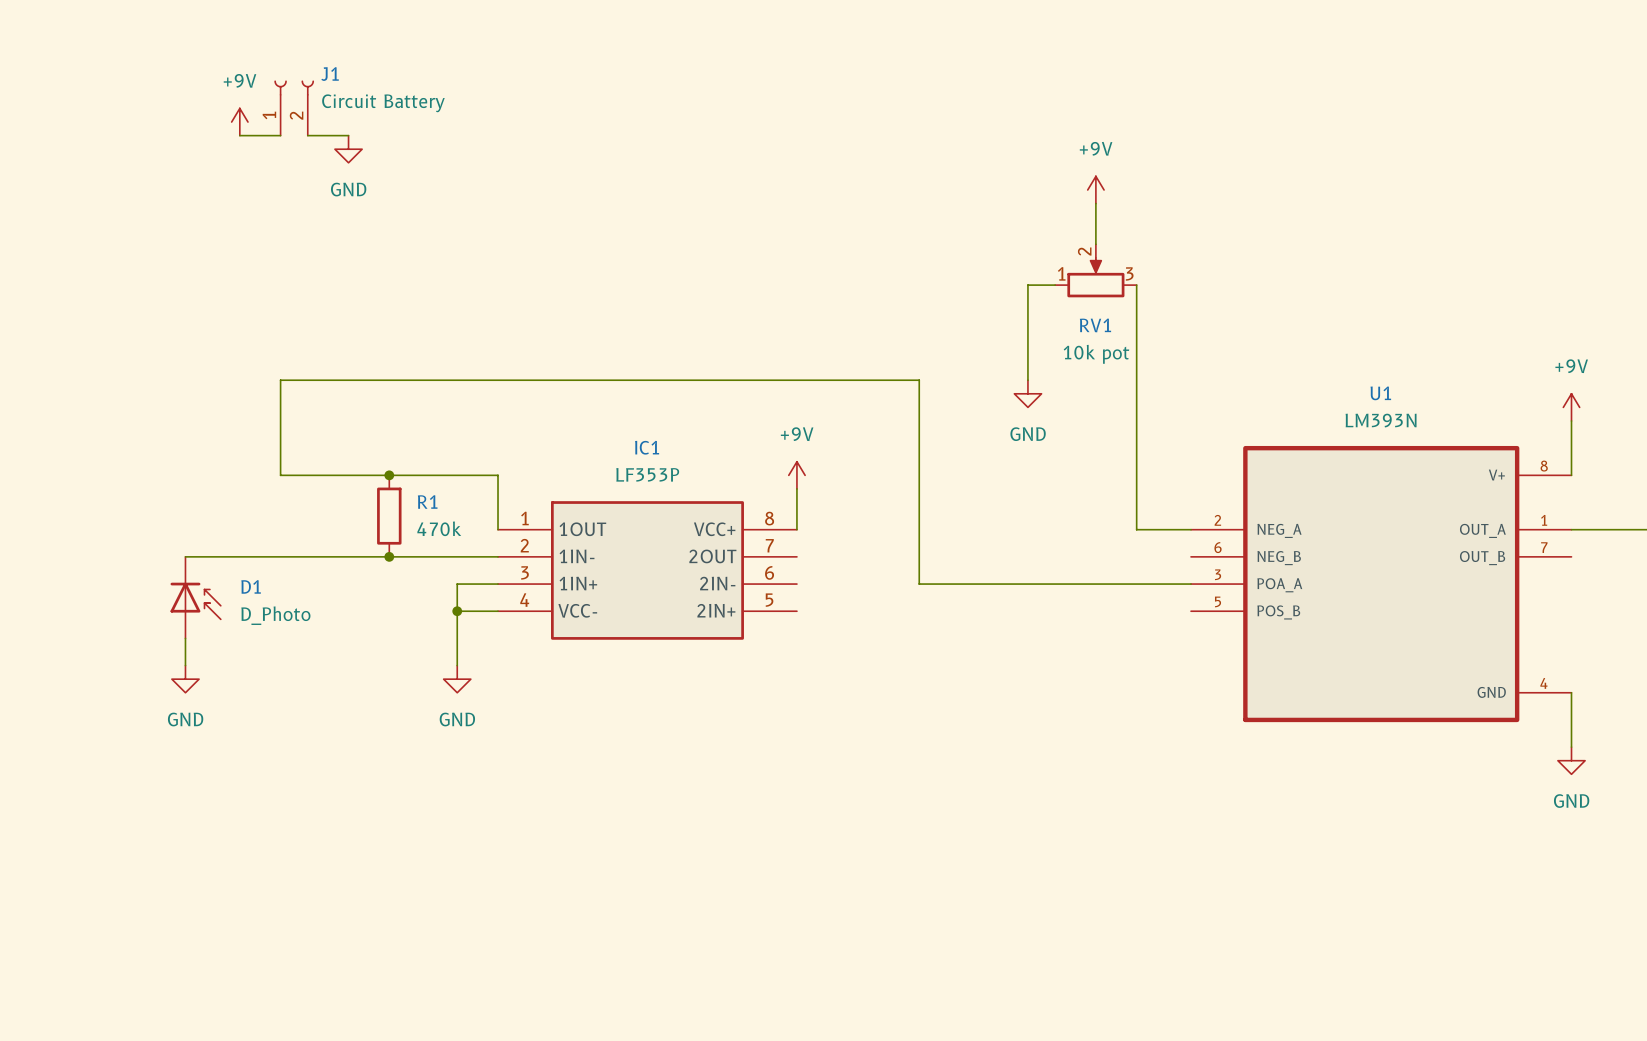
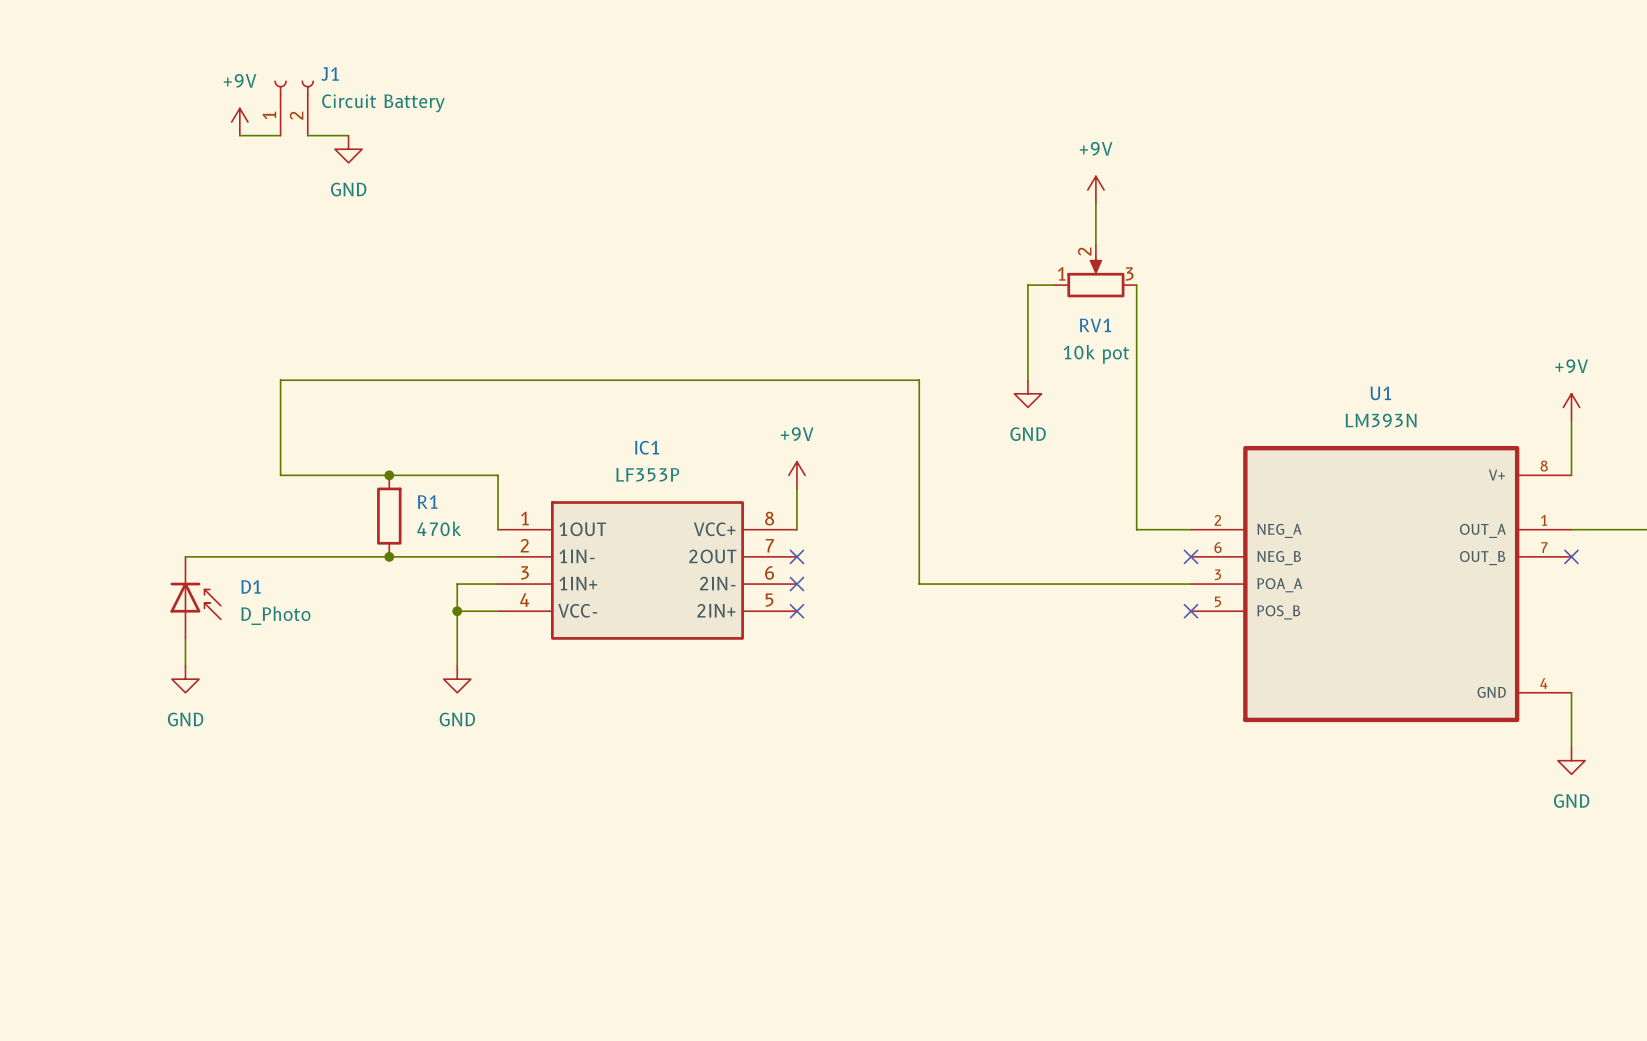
no-connect mark: none -> (796, 556)
no-connect mark: none -> (1191, 556)
no-connect mark: none -> (1571, 556)
no-connect mark: none -> (796, 584)
no-connect mark: none -> (796, 611)
no-connect mark: none -> (1191, 611)

